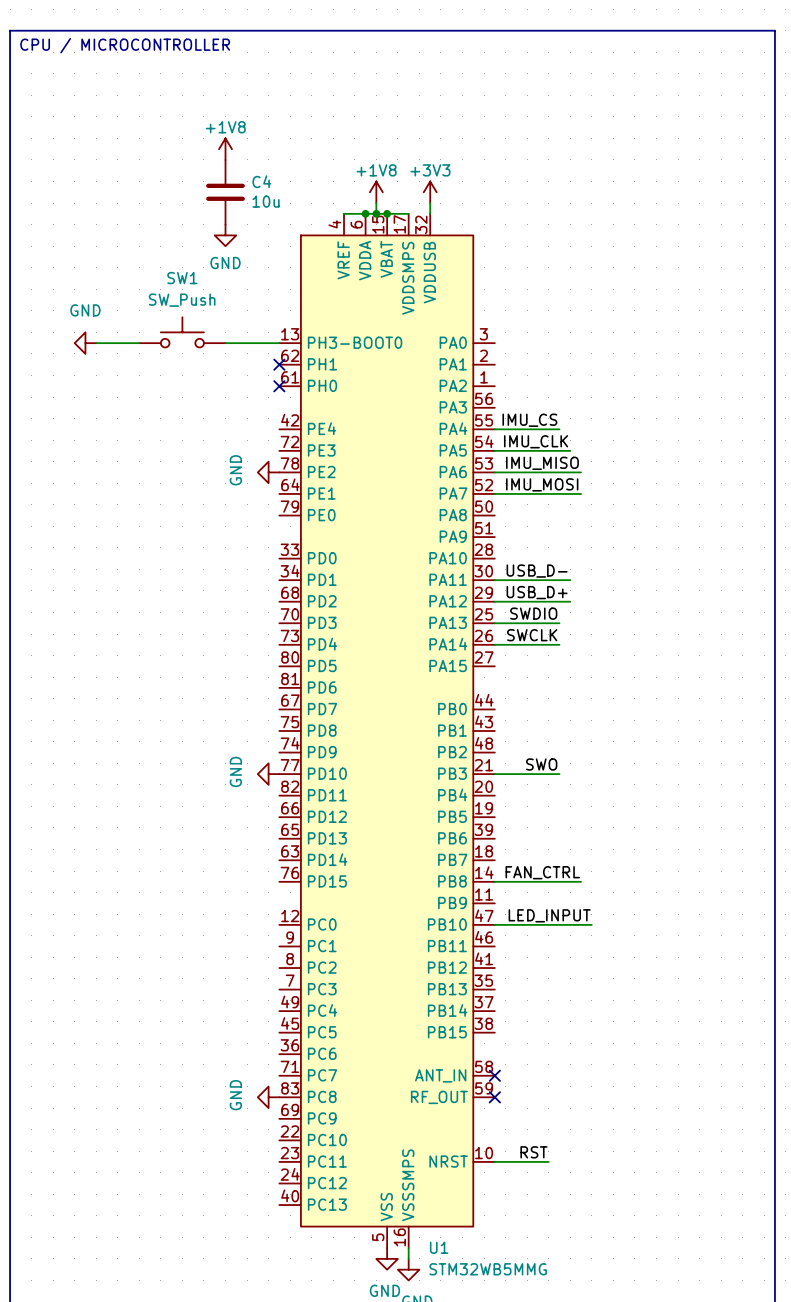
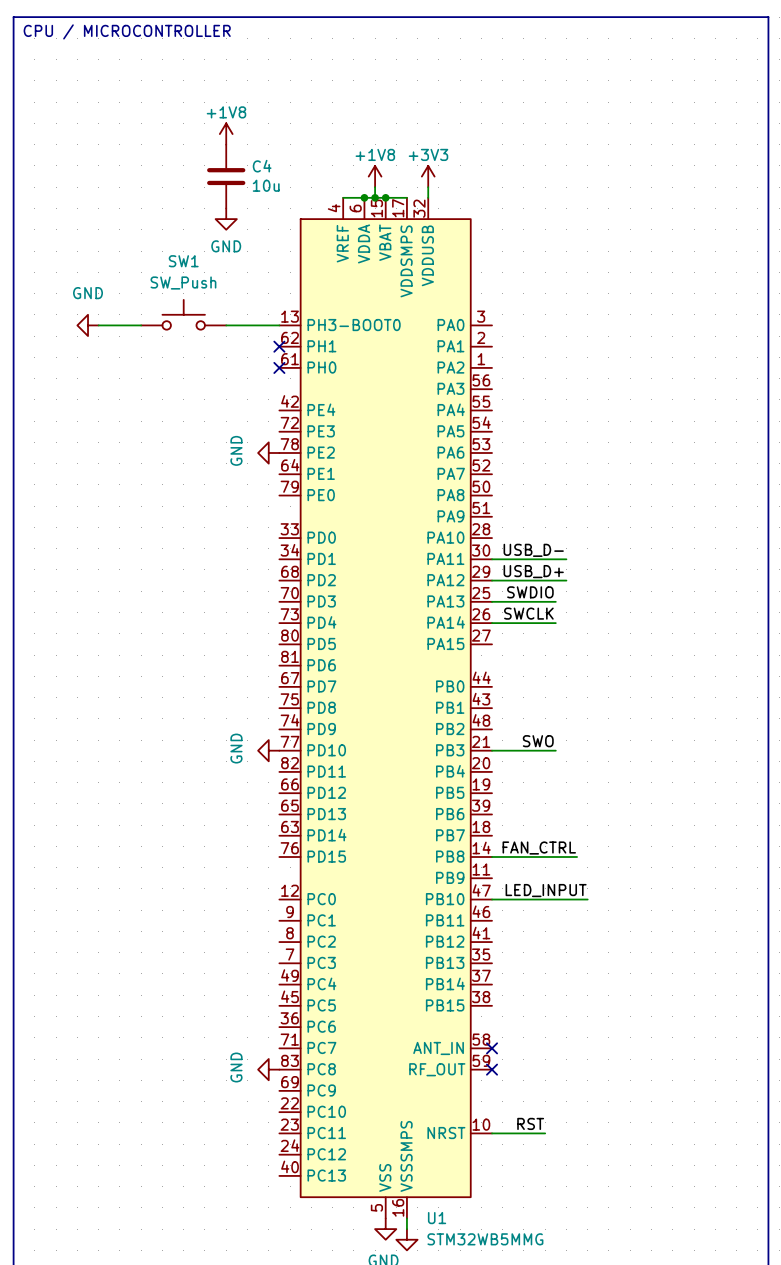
label: IMU_CS (529, 420) -> none
wire: (494, 429) (559, 429) -> none
label: IMU_CLK (536, 441) -> none
wire: (494, 450) (570, 450) -> none
label: IMU_MISO (542, 463) -> none
wire: (494, 472) (581, 472) -> none
label: IMU_MOSI (542, 484) -> none
wire: (494, 493) (581, 493) -> none

